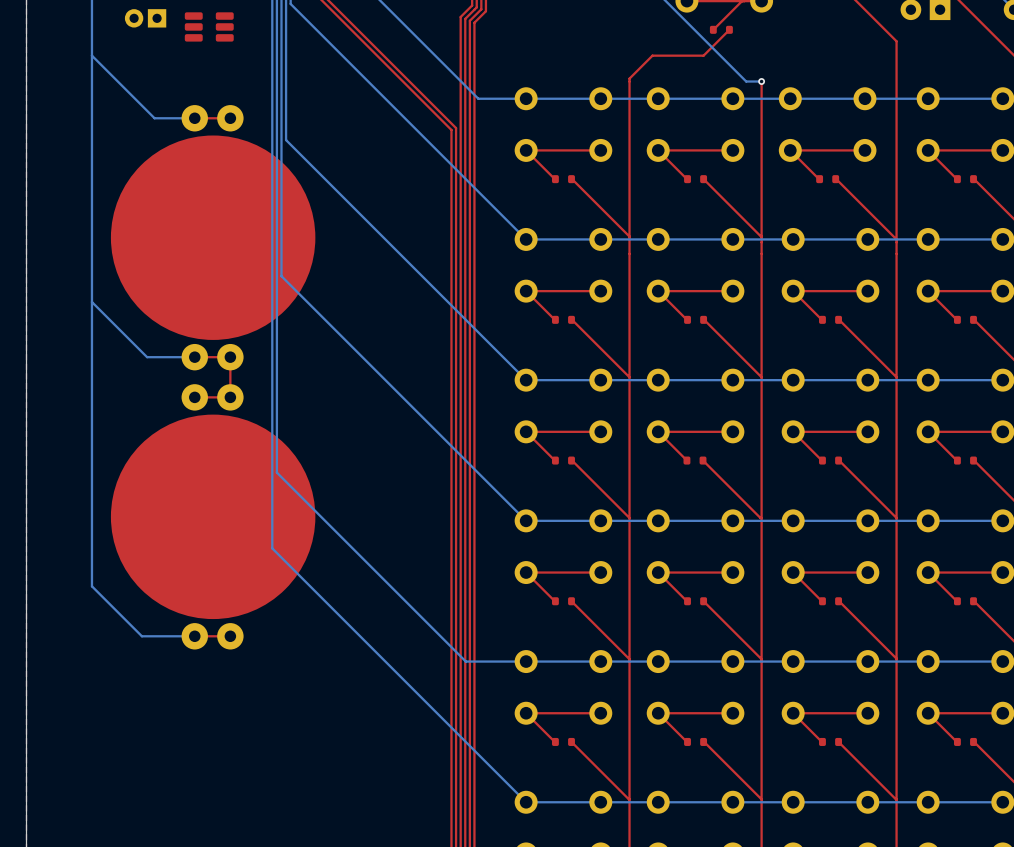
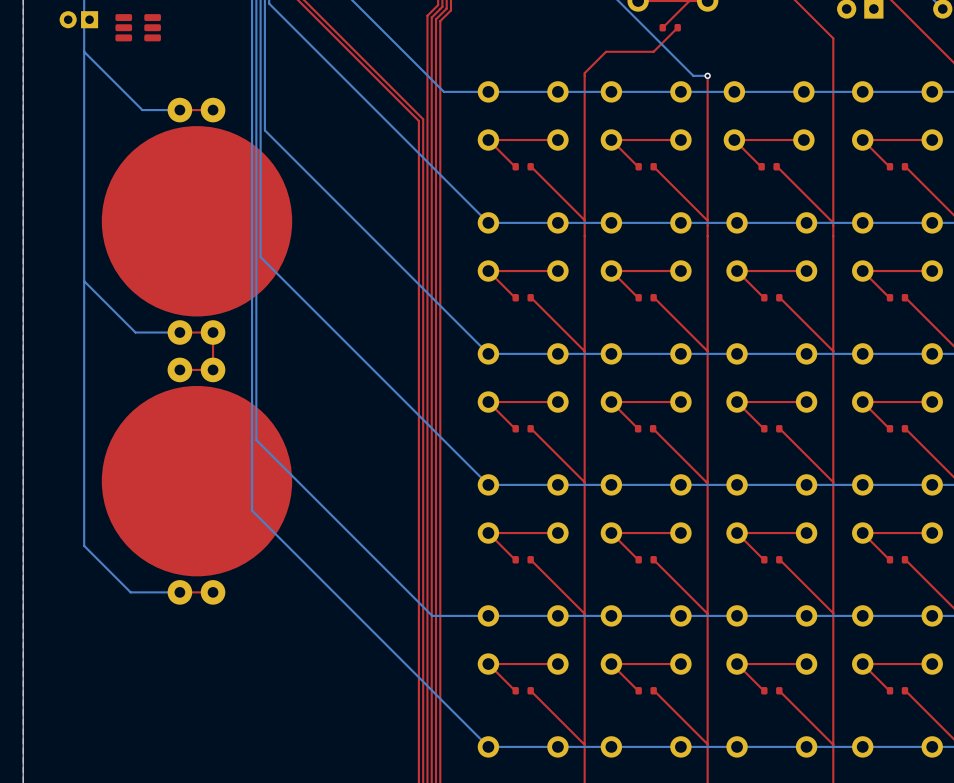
part position: (145, 18) -> (78, 19)
part position: (209, 26) -> (138, 27)

